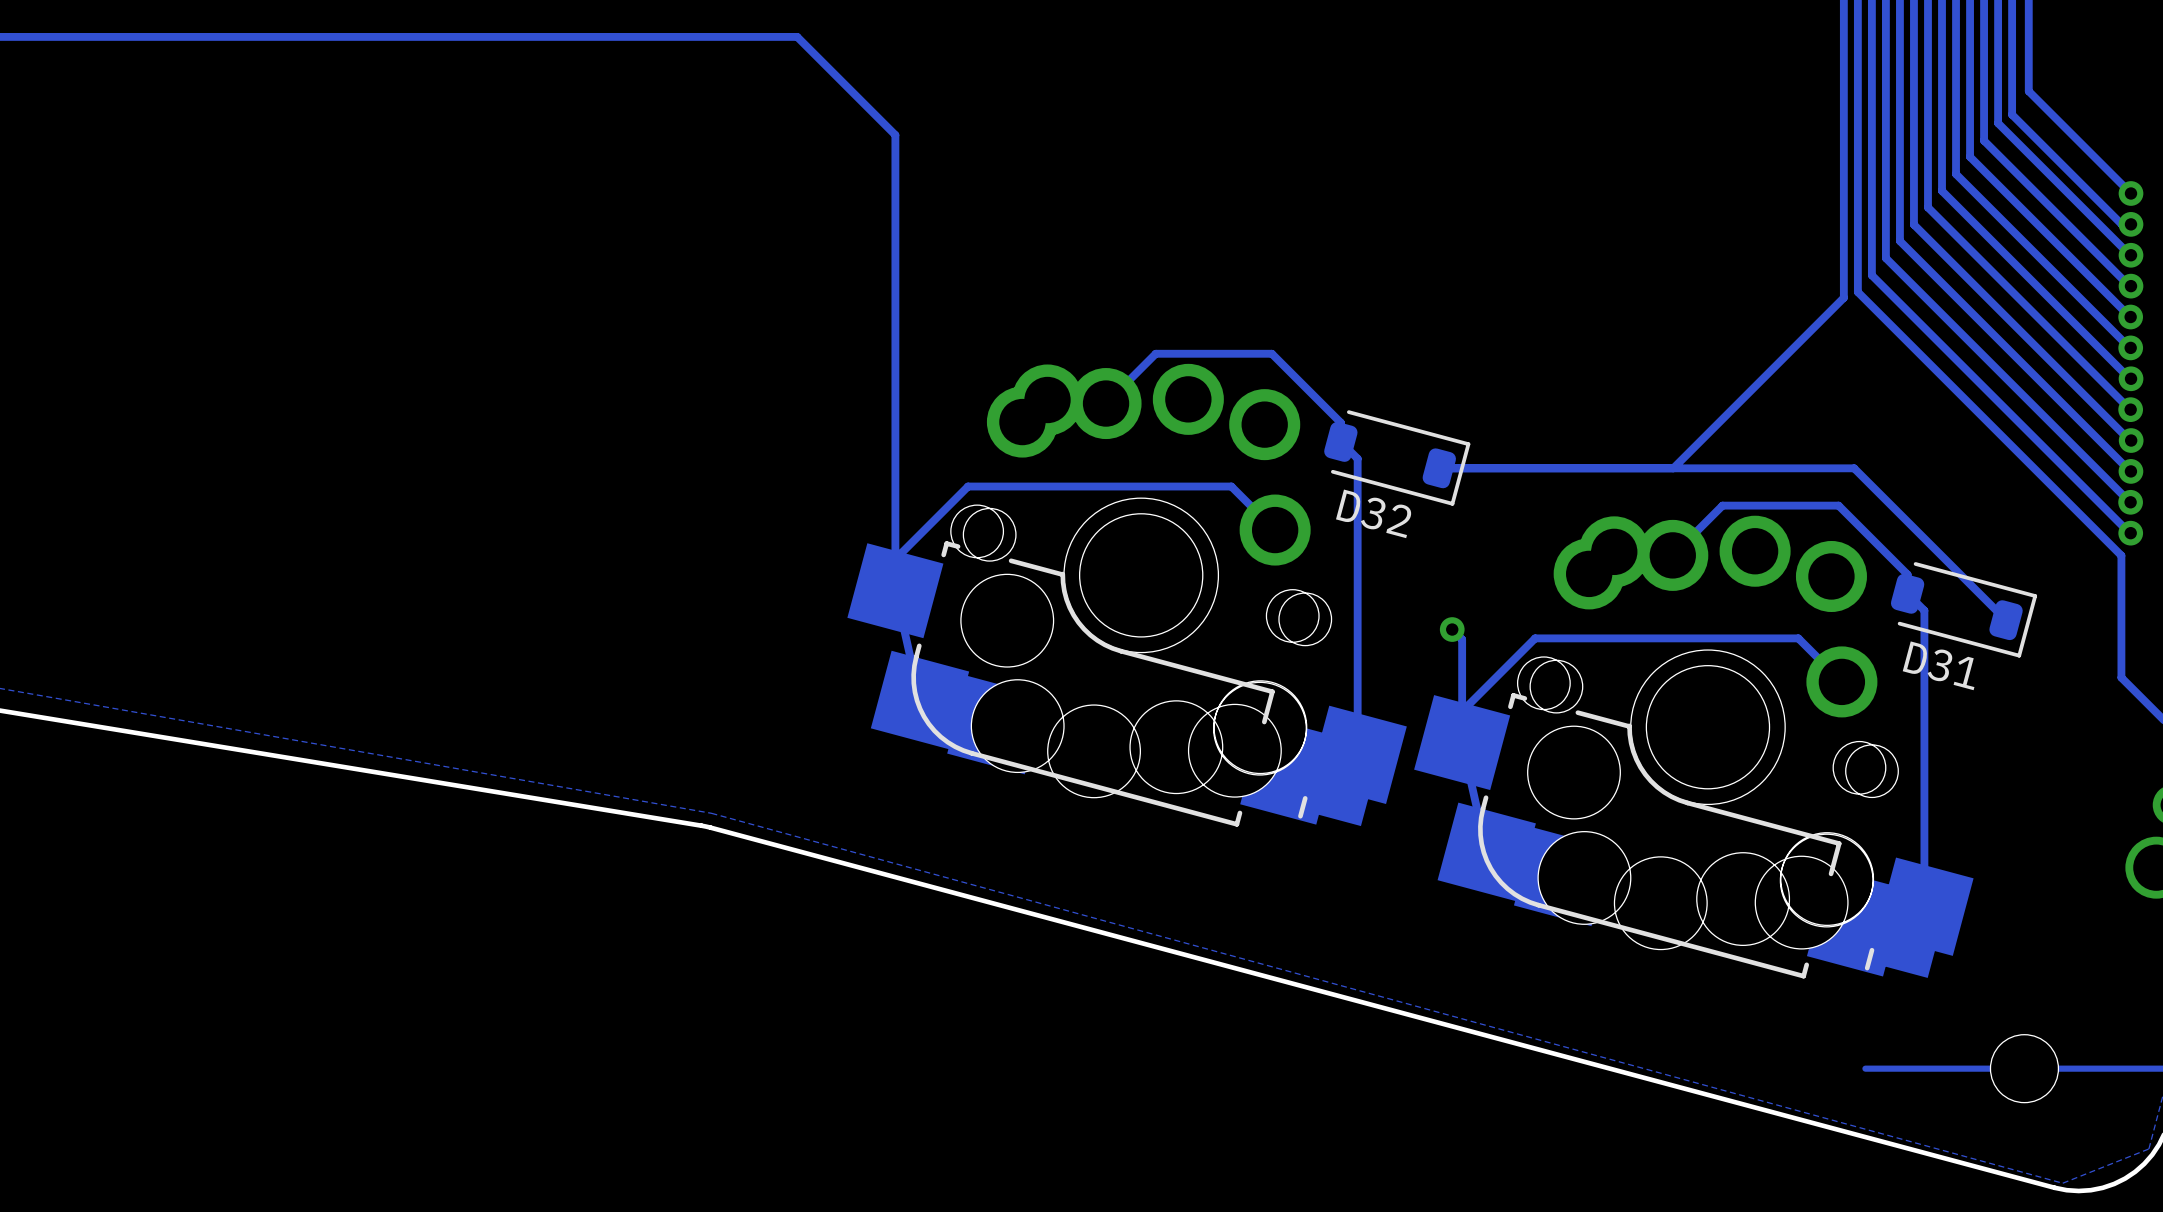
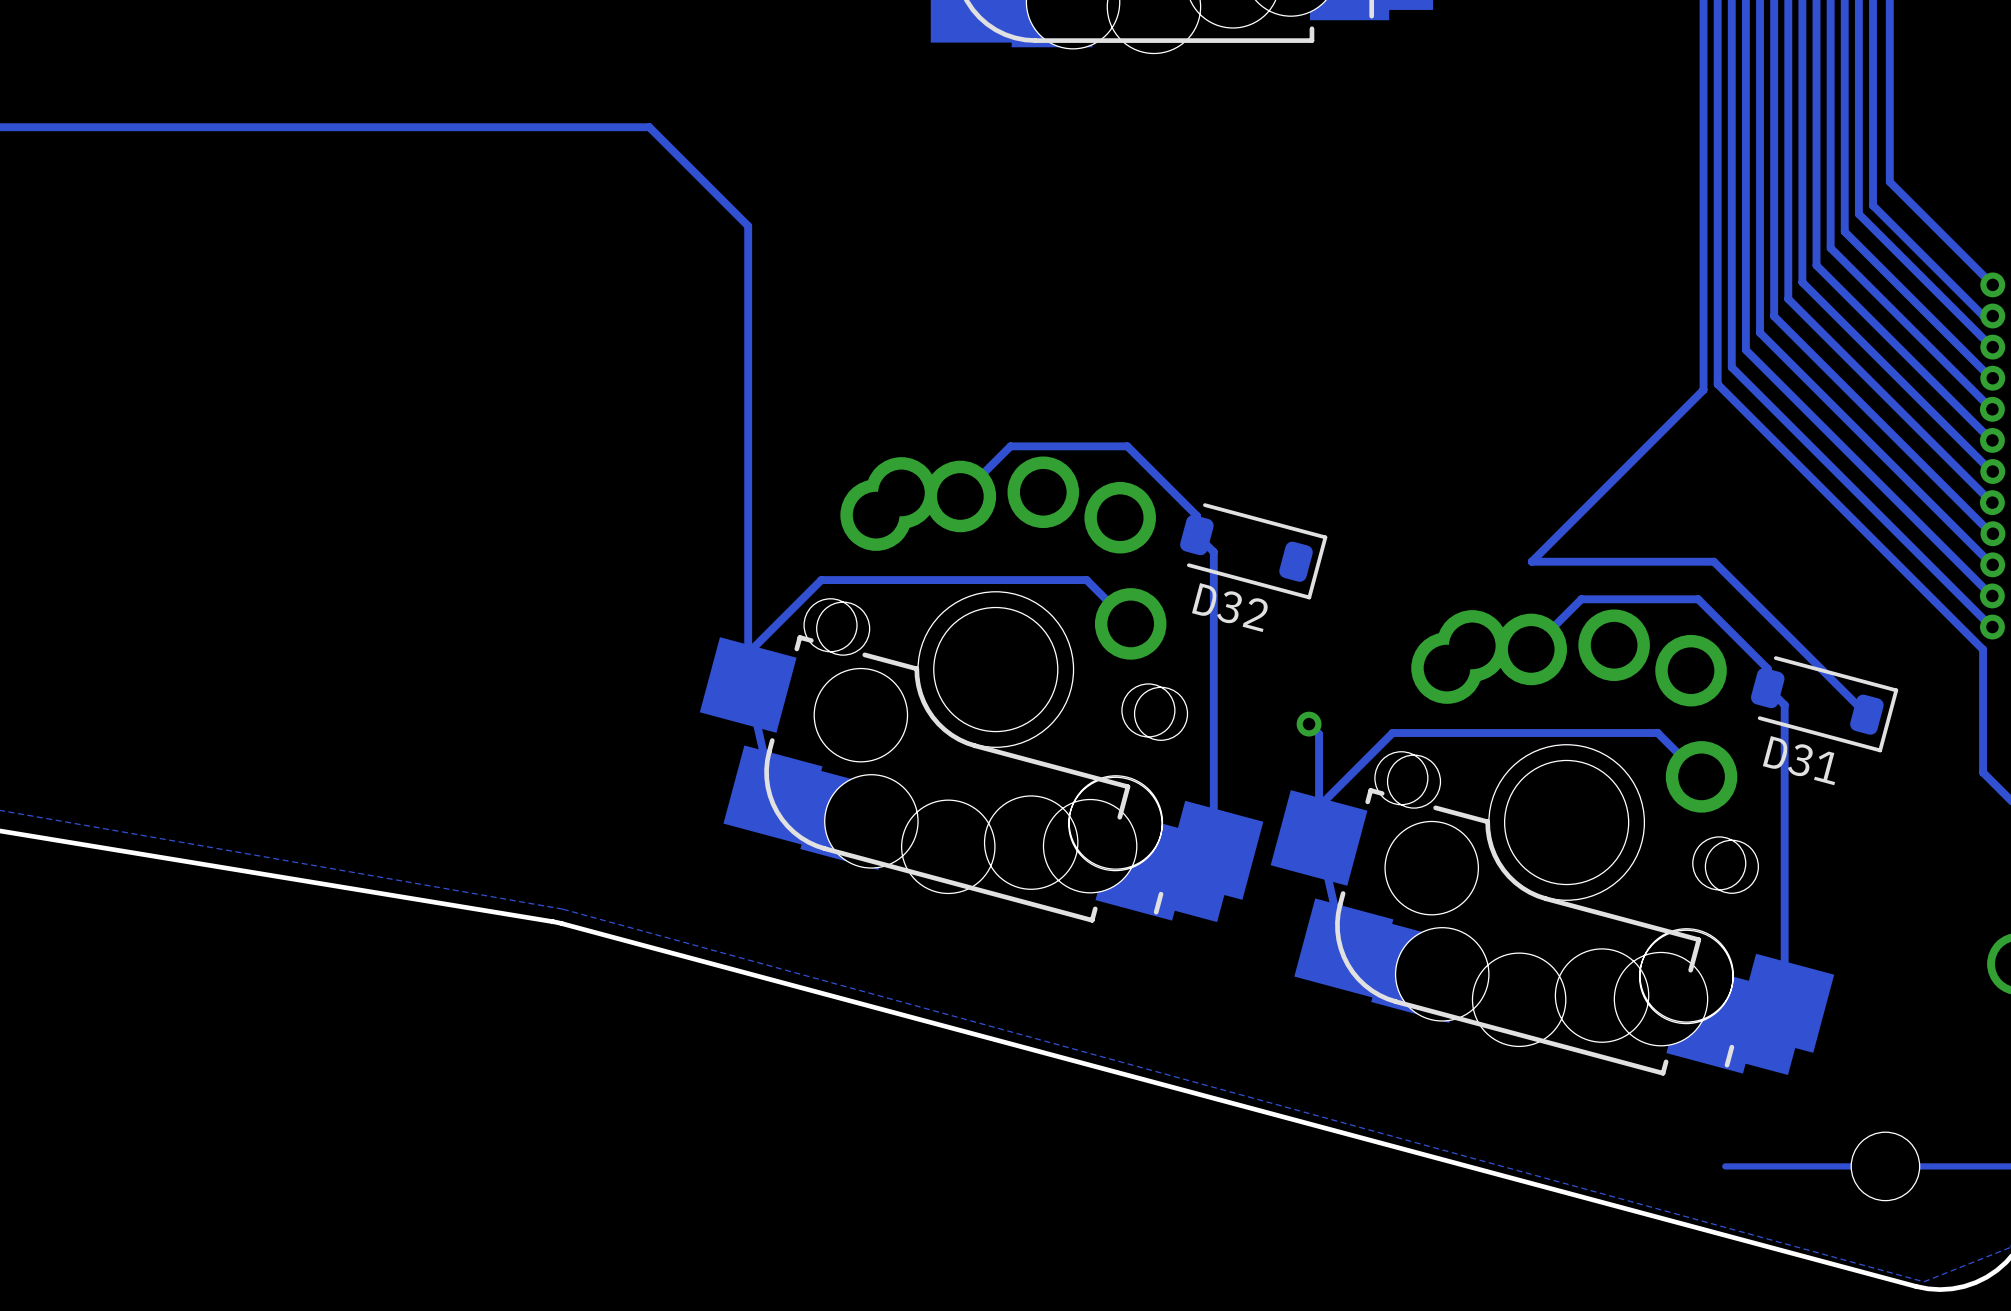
track: (1673, 468) (1439, 468) -> none

